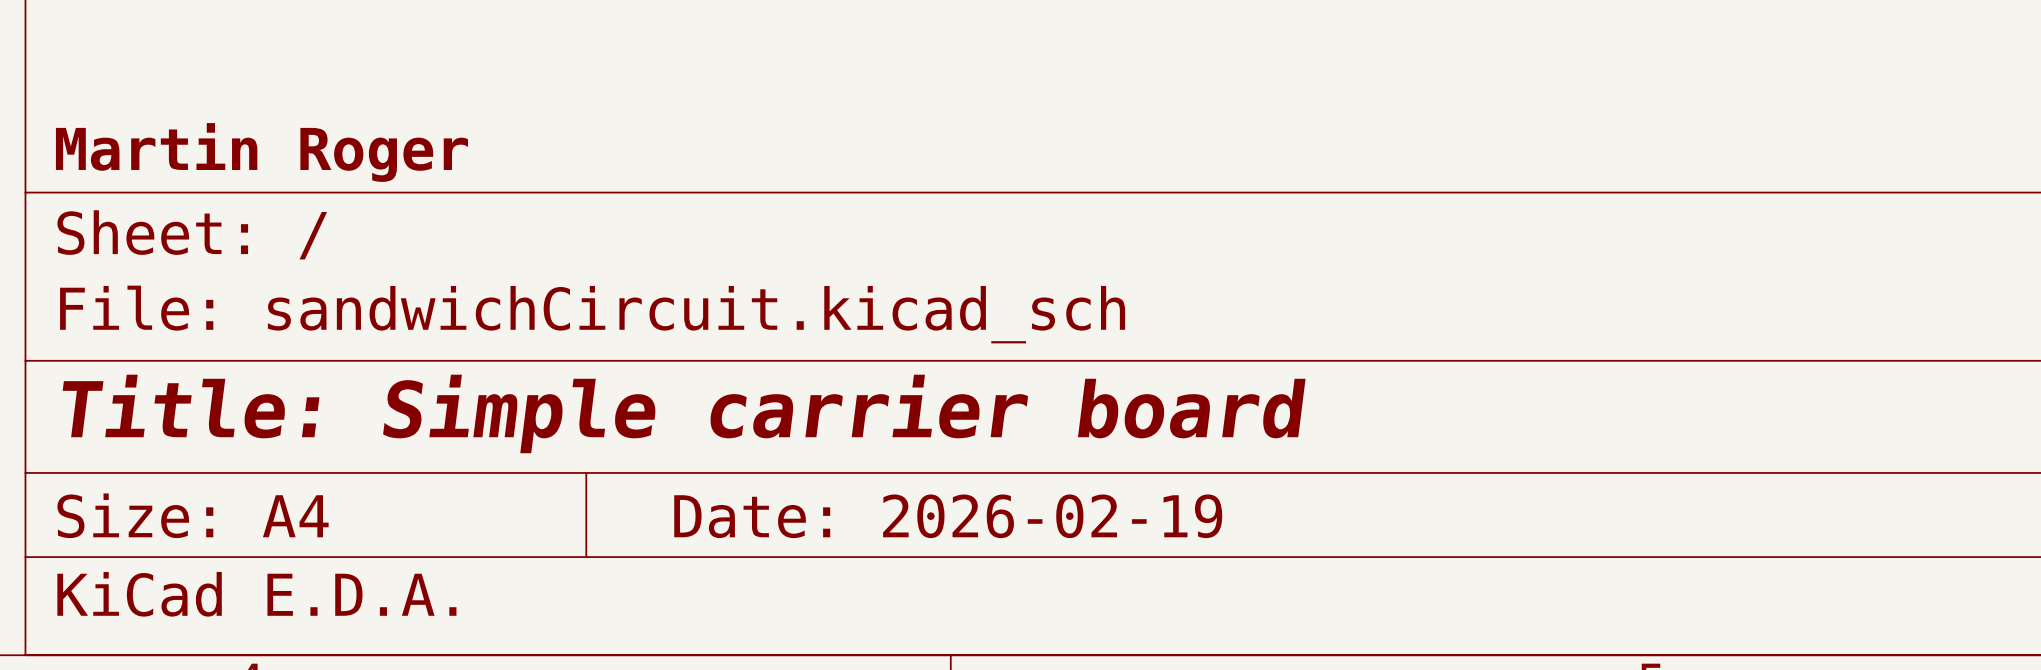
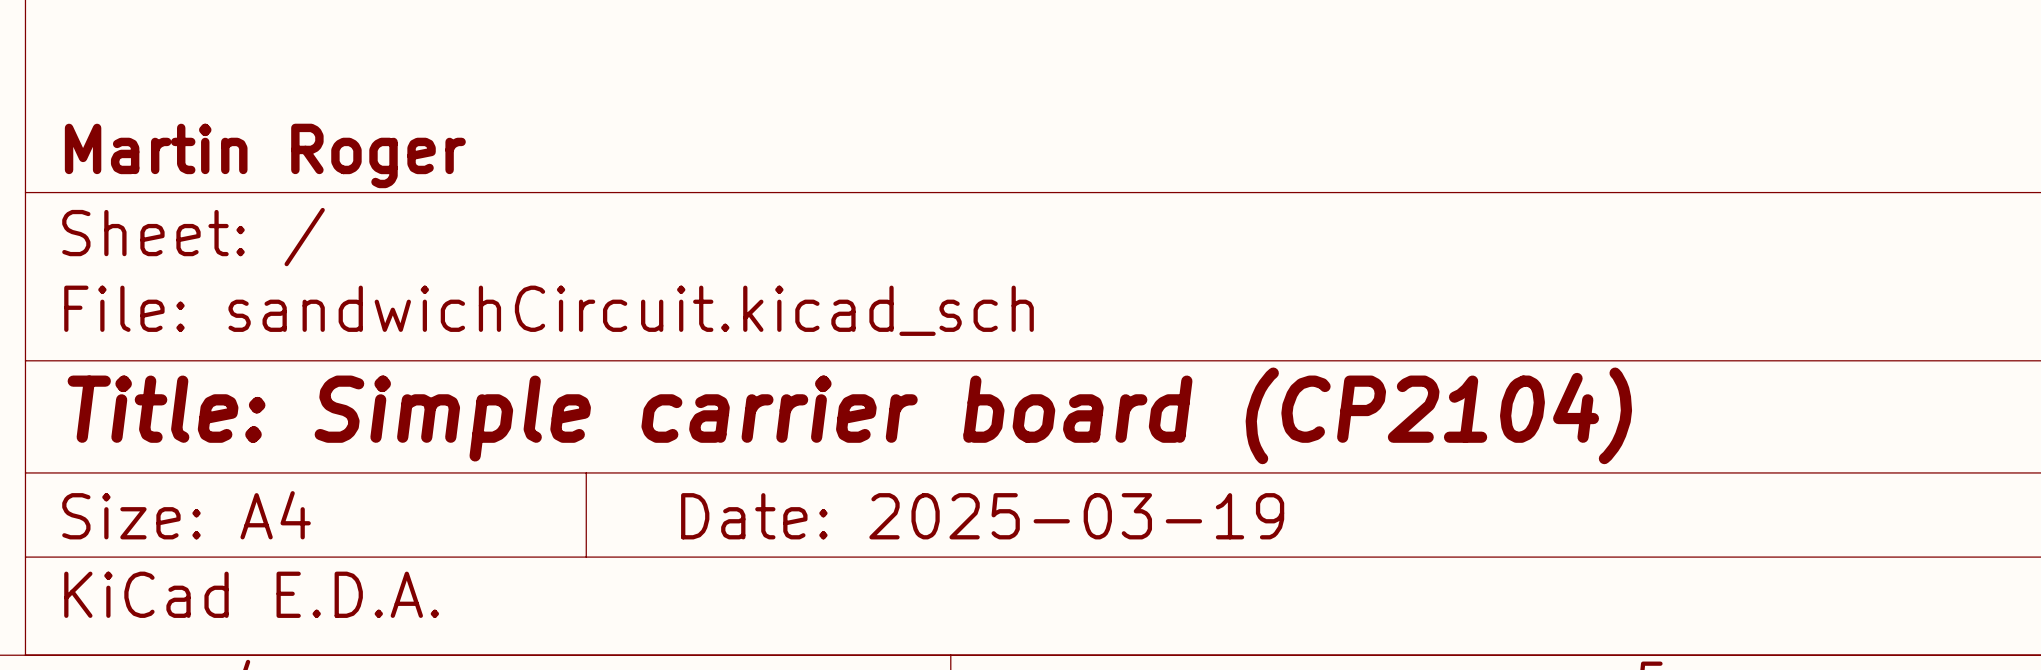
title block: Title: Simple carrier board (684, 413) -> Title: Simple carrier board (CP2104) (849, 415)
title block: Date: 2026-02-19 (948, 516) -> Date: 2025-03-19 (982, 516)

